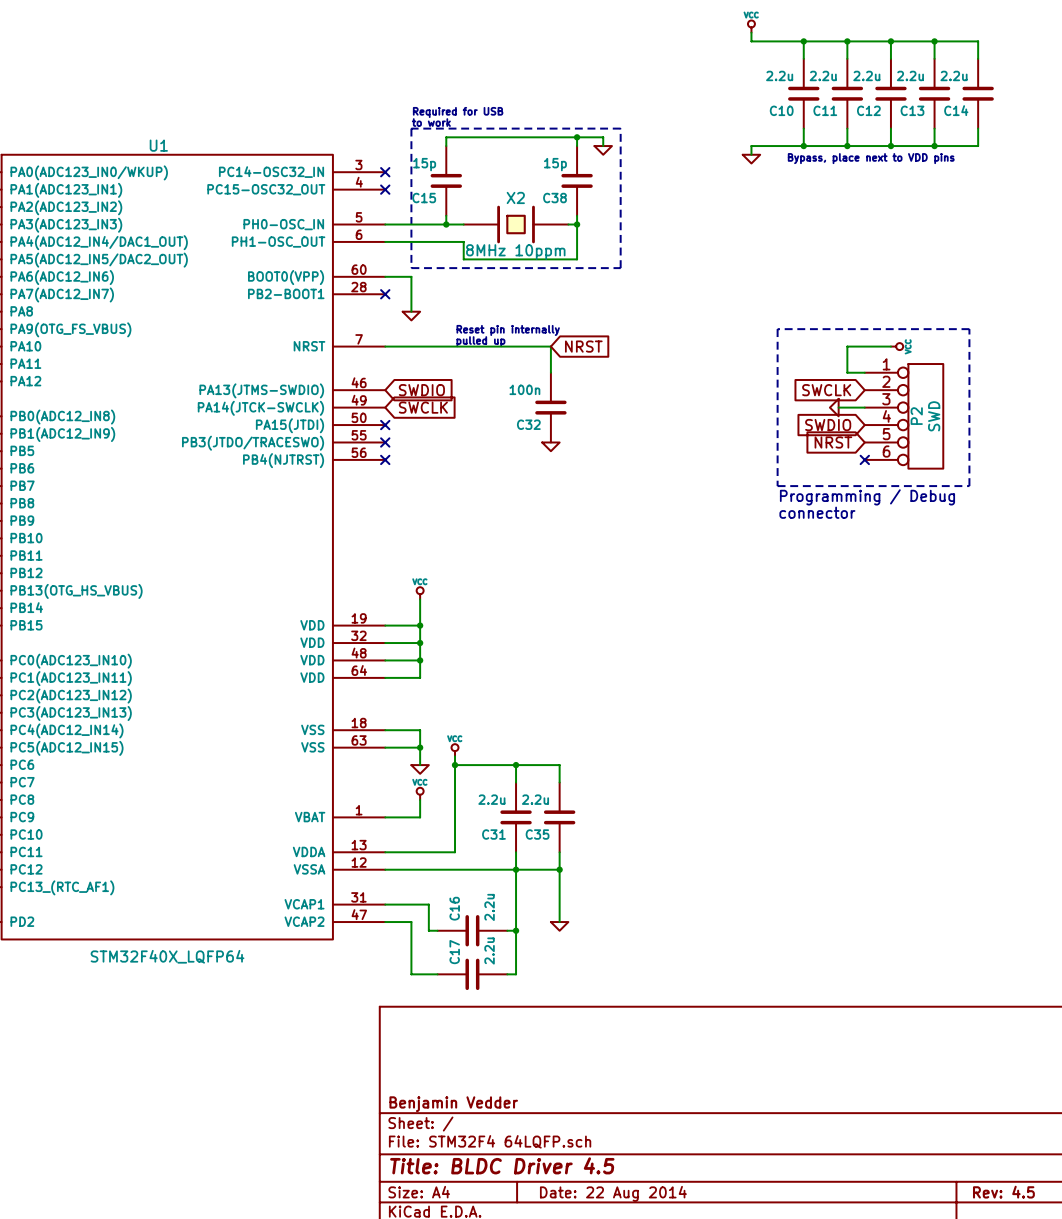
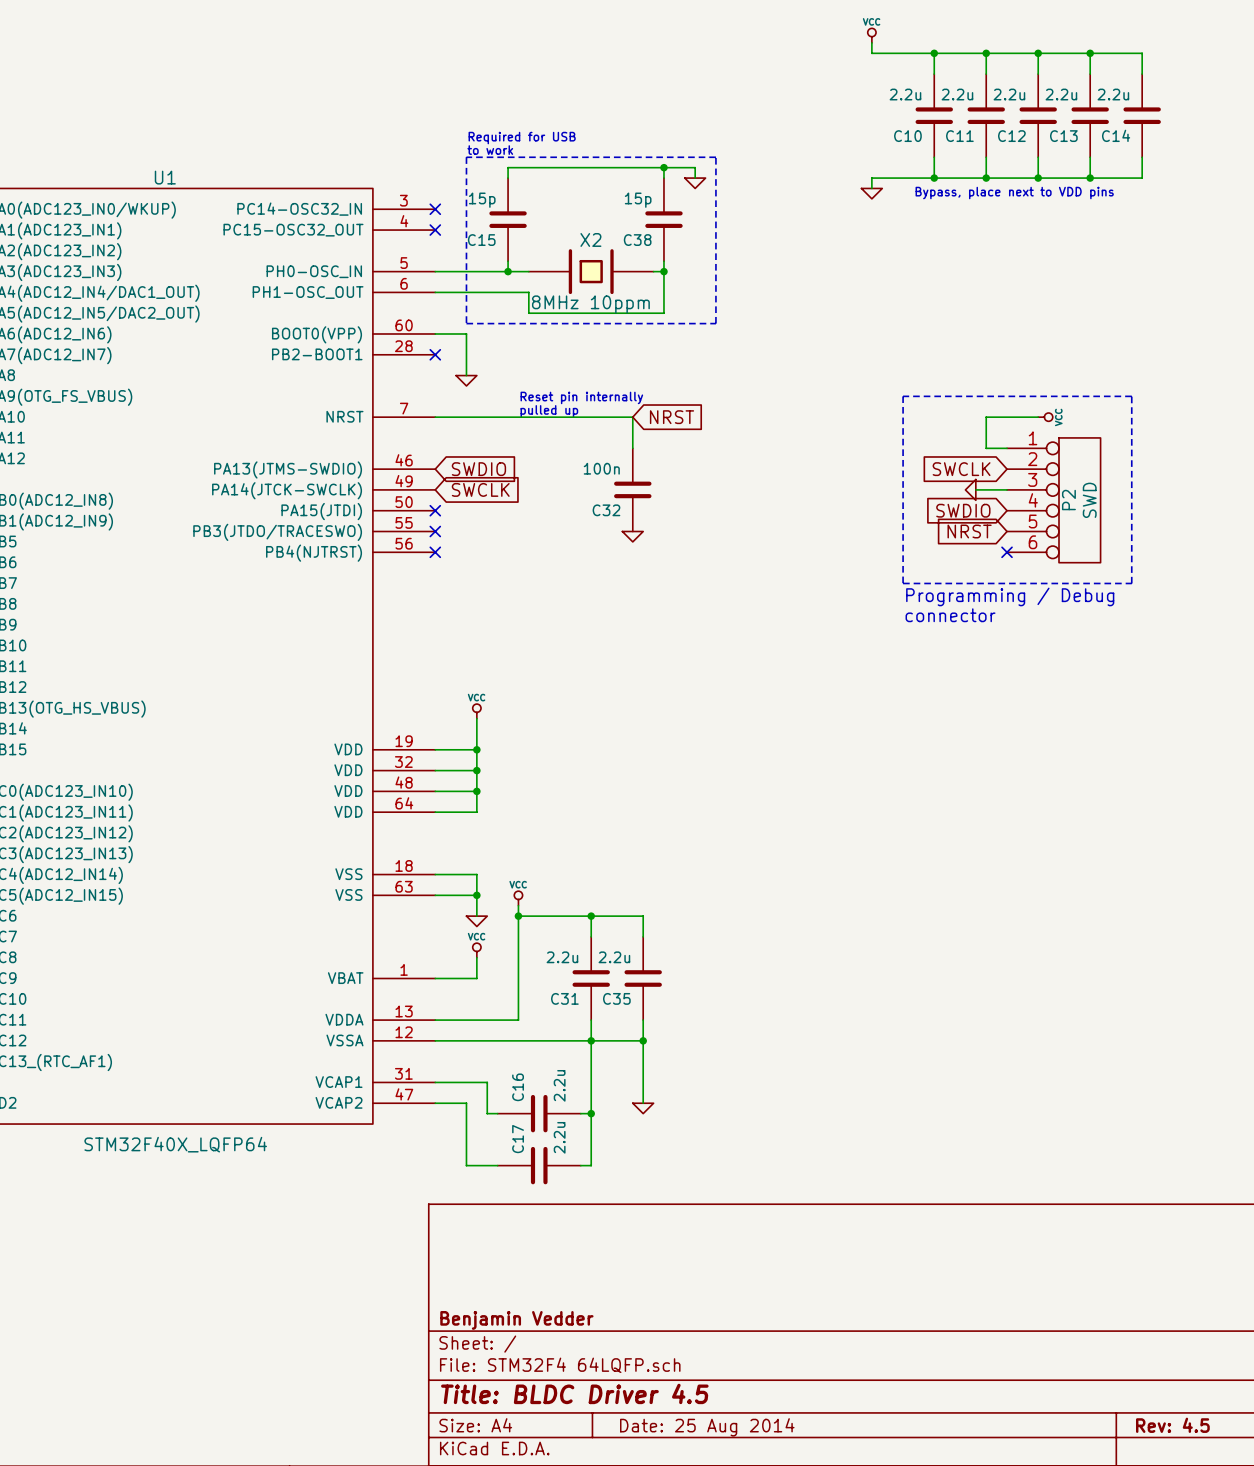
title block: Date: 22 Aug 2014 (613, 1193) -> Date: 25 Aug 2014 (707, 1427)

